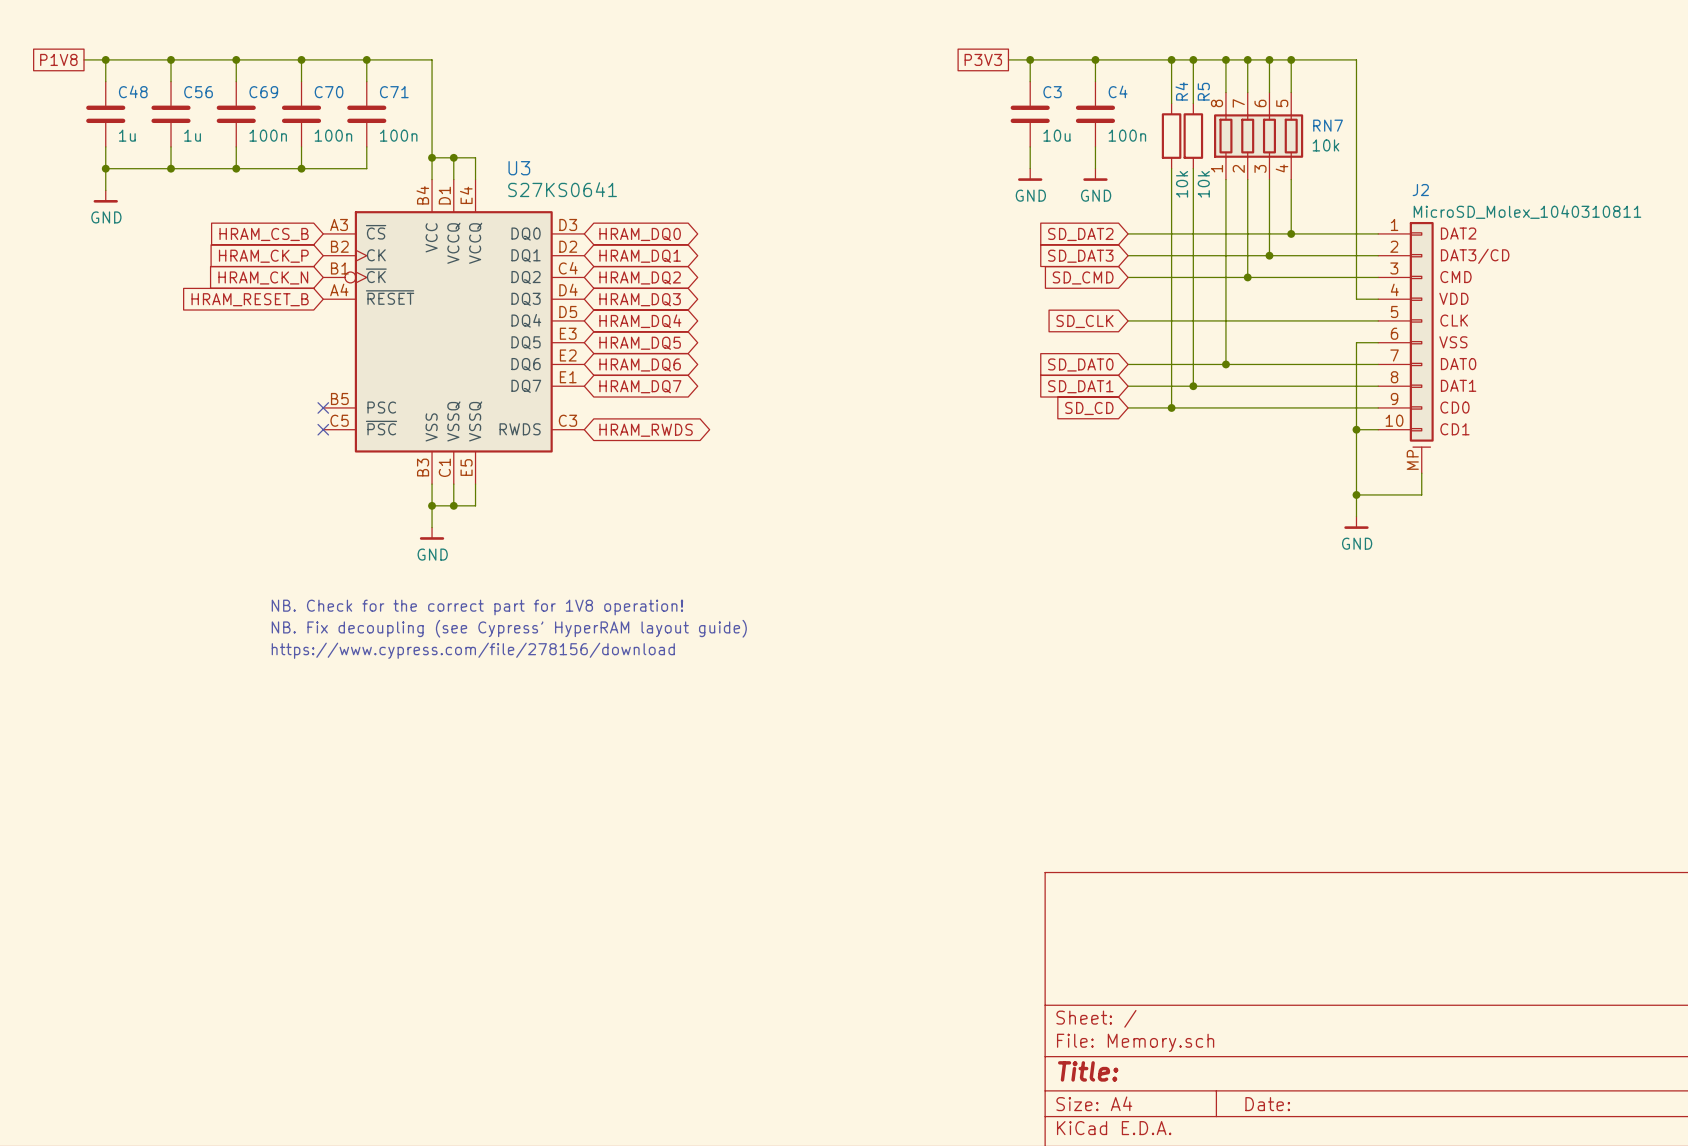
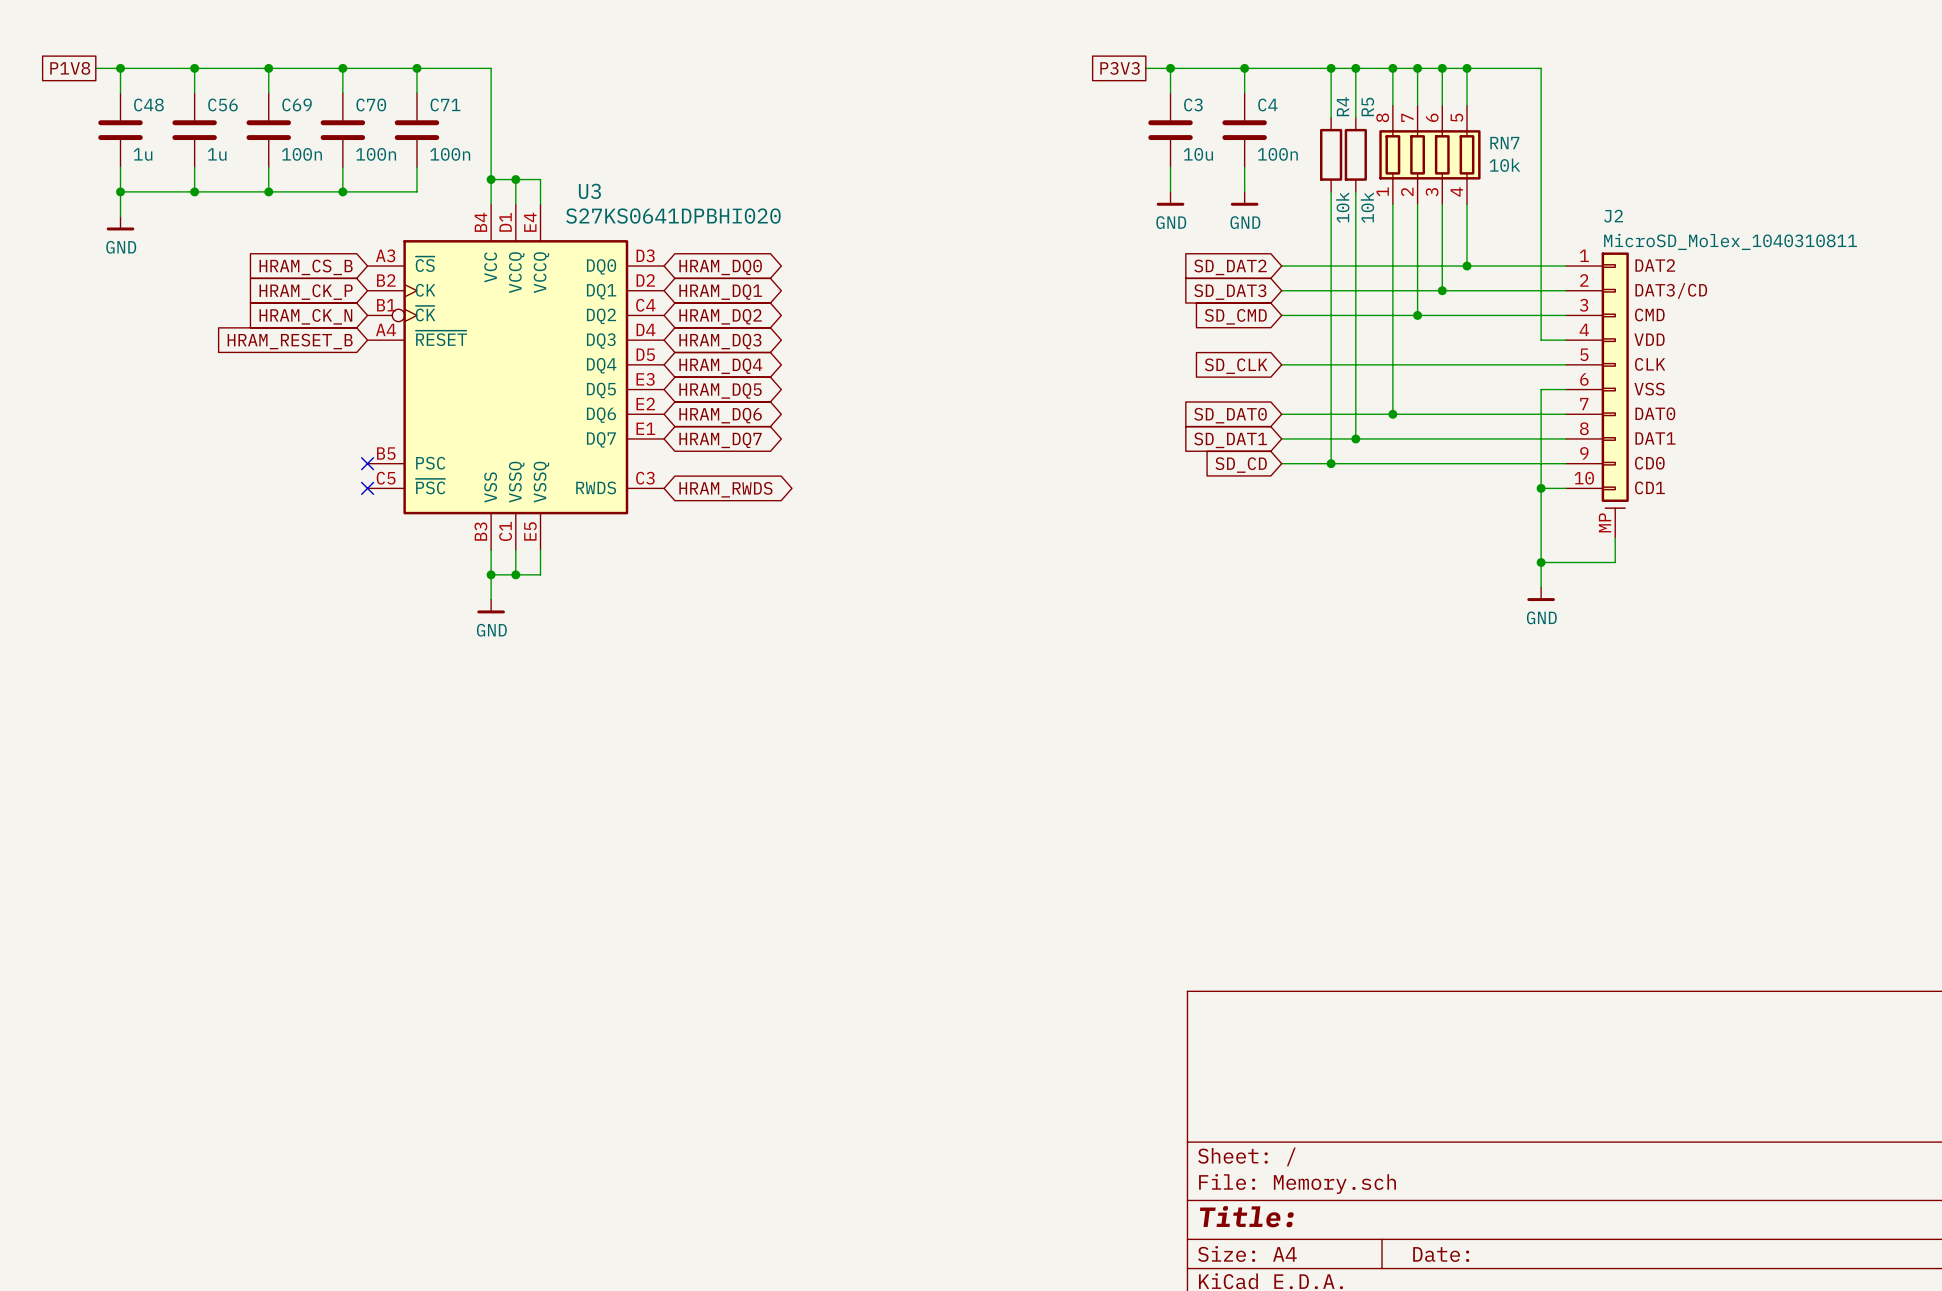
U3 value: S27KS0641 (562, 189) -> S27KS0641DPBHI020 (673, 216)
text: NB. Check for the correct part for 1V8 operation! (477, 607) -> none
text: NB. Fix decoupling (see Cypress’ HyperRAM layout guide) (509, 628) -> none
text: https://www.cypress.com/file/278156/download (473, 650) -> none

